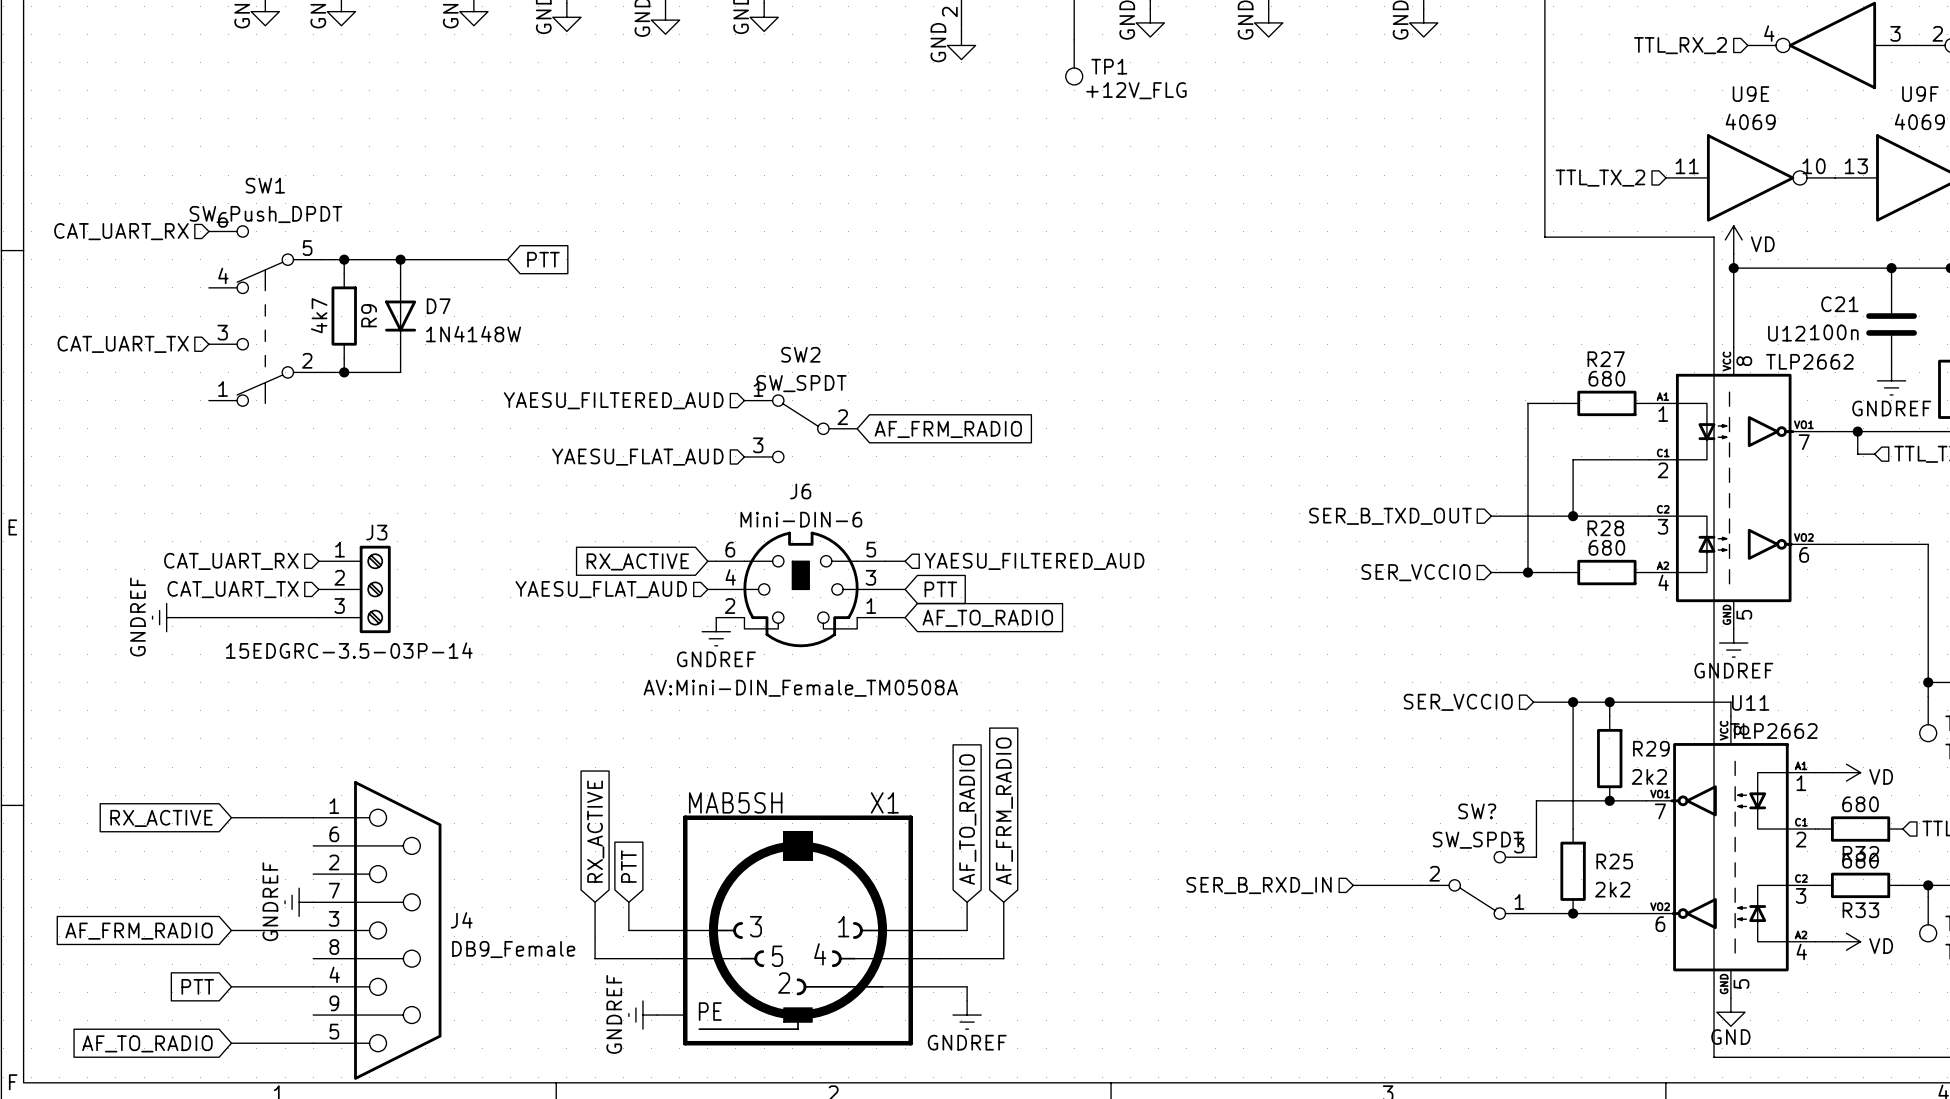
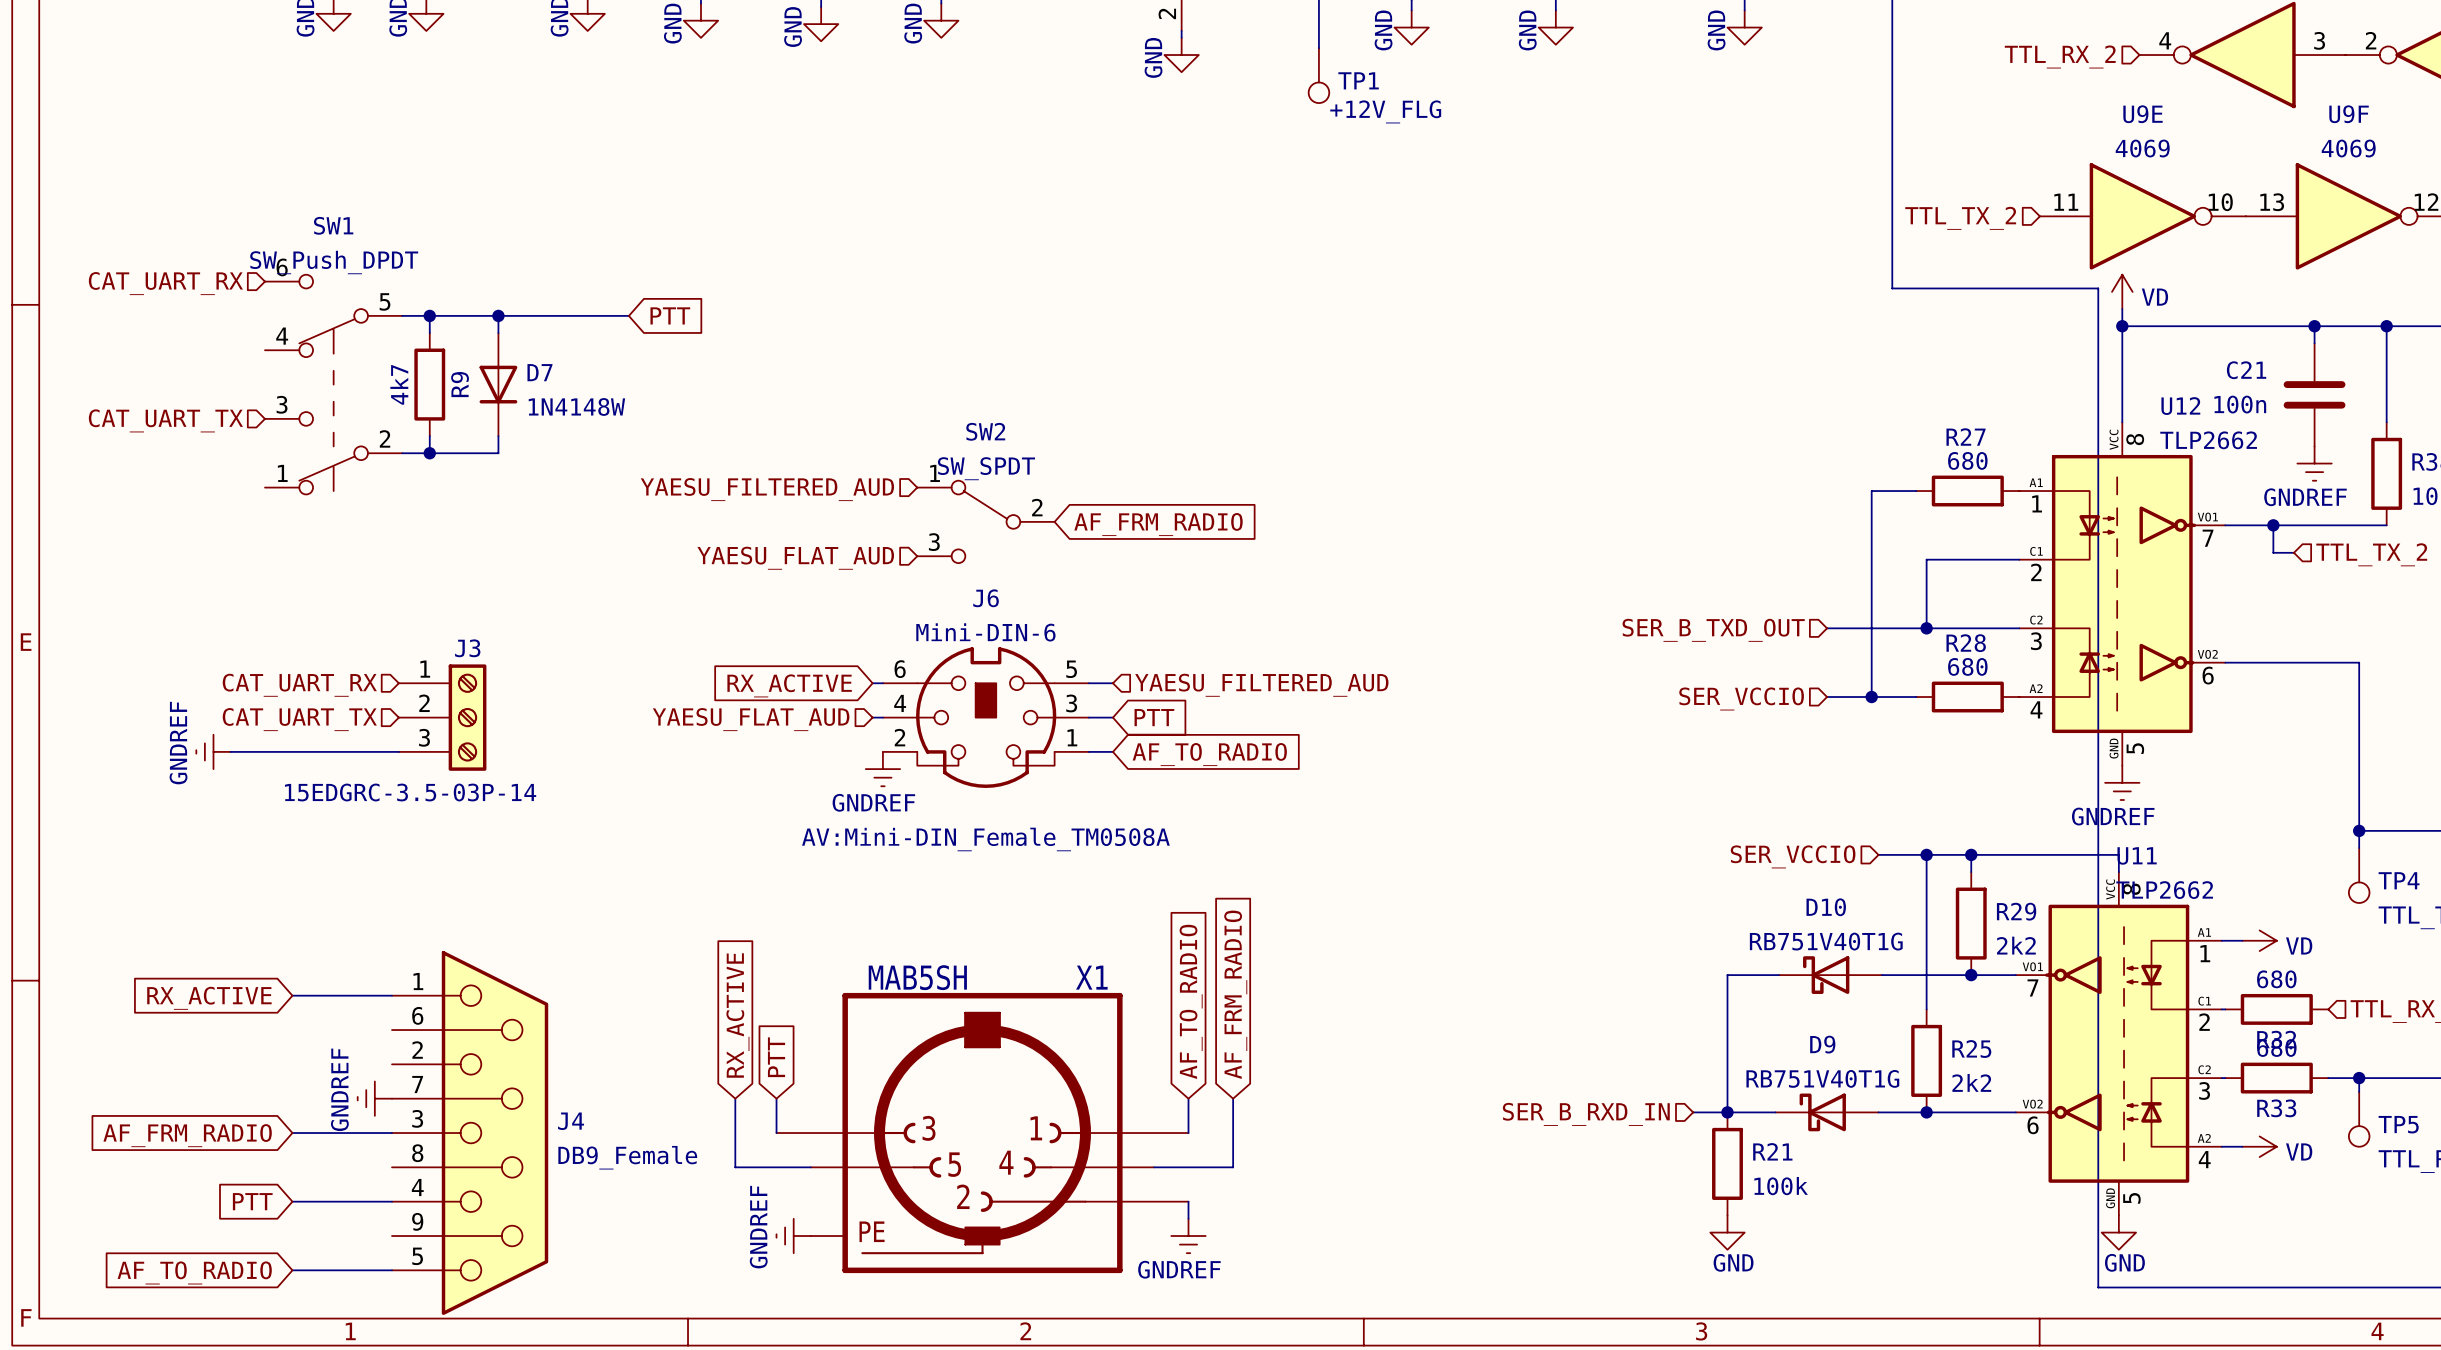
wire: none -> (1778, 975) (1727, 975) (1727, 1112)
D10: none -> RB751V40T1G (1830, 975)
wire: (1536, 800) (1536, 857) (1533, 857) -> none
hierarchical label position: SER_B_RXD_IN (1259, 885) -> SER_B_RXD_IN (1586, 1114)
wire: (1353, 885) (1420, 885) -> (1693, 1112) (1775, 1112)
SW?: SW_SPDT (1477, 885) -> none
junction: none -> (1727, 1112)
D9: none -> RB751V40T1G (1827, 1112)
R21: none -> 100k (1727, 1163)
power symbol: none -> GND (1727, 1232)

